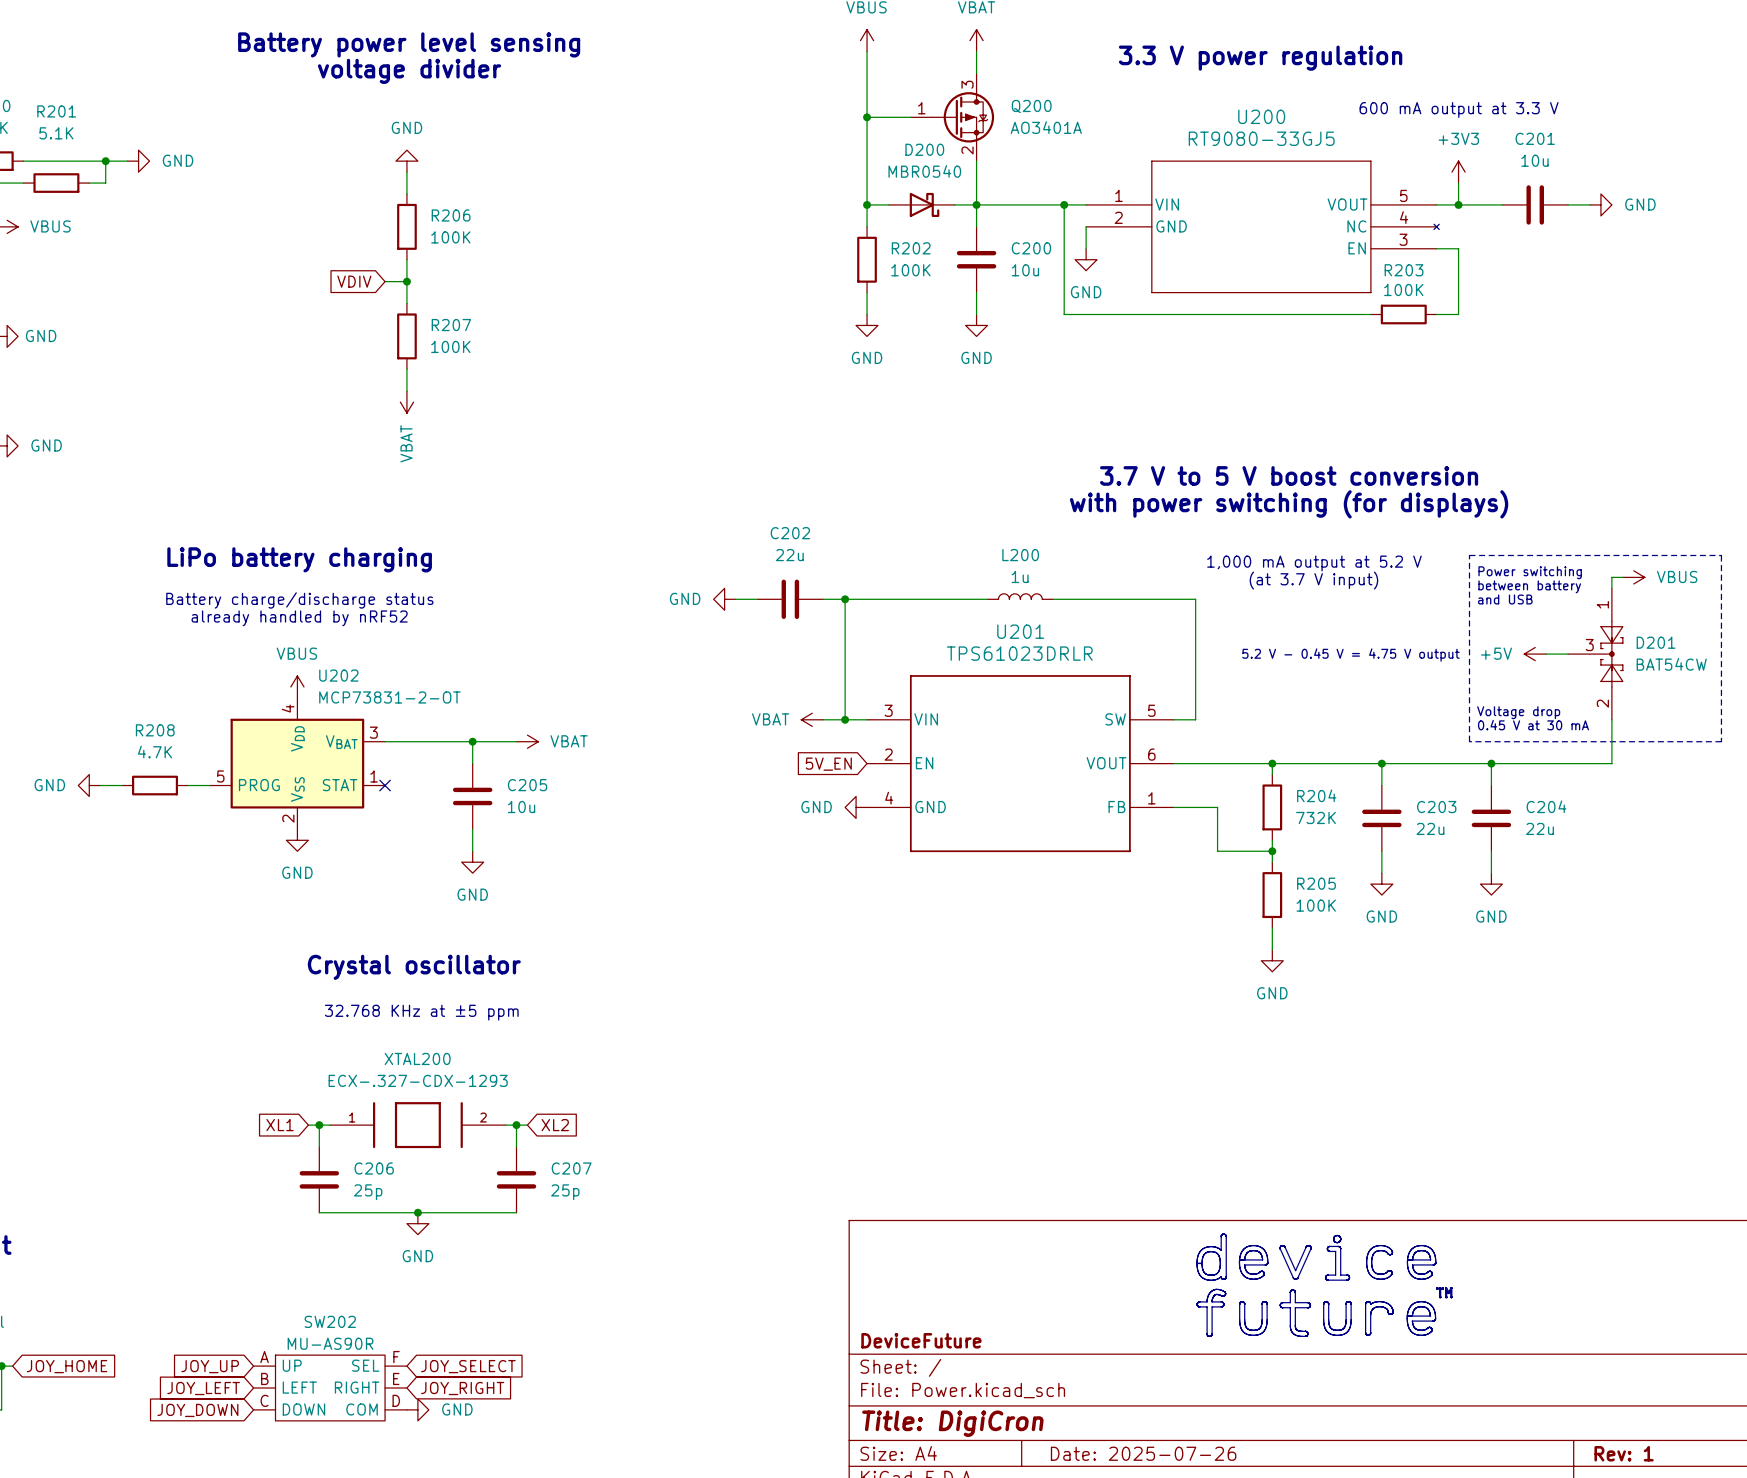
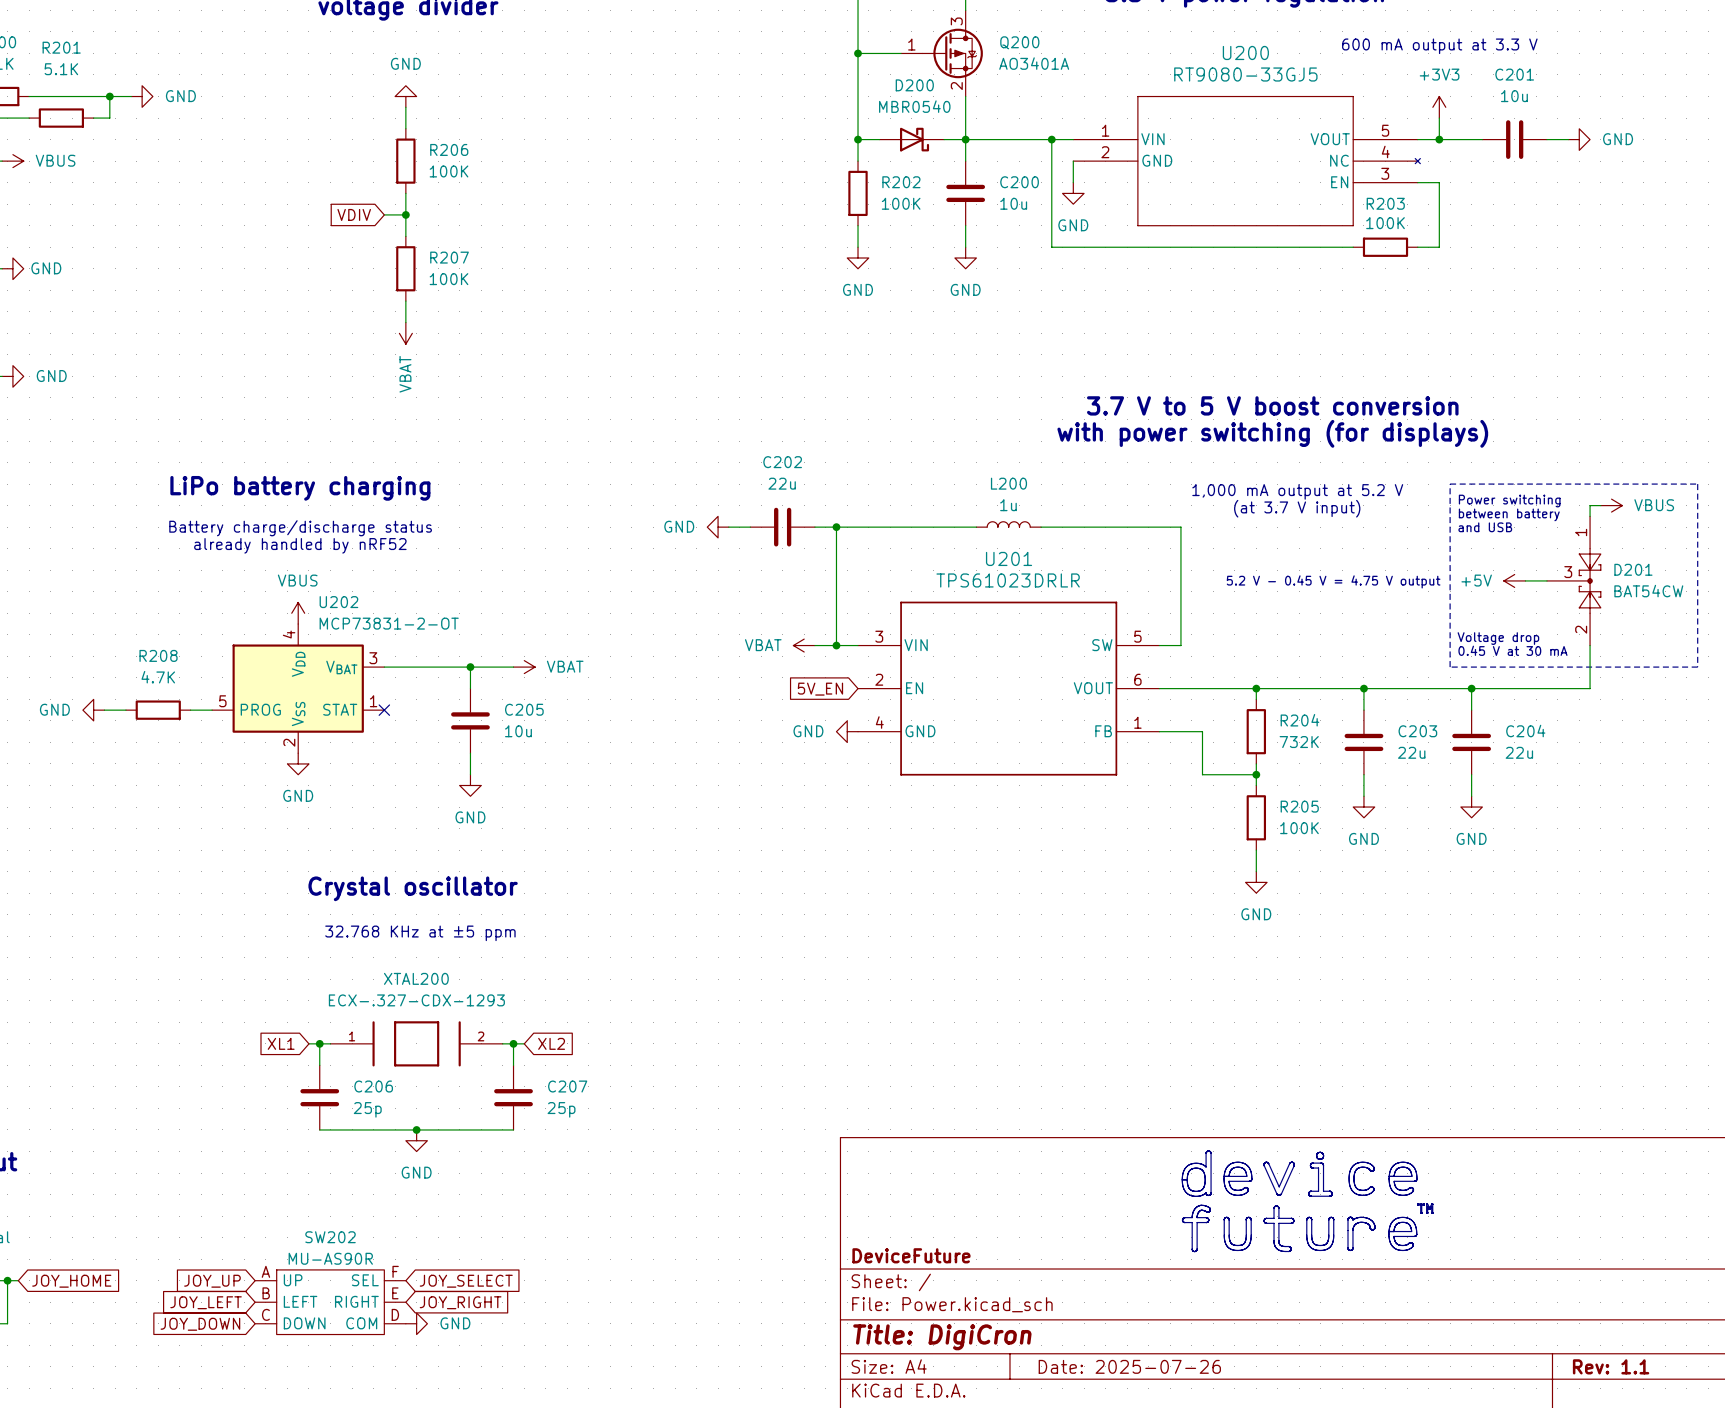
title block: Rev: 1 (1624, 1453) -> Rev: 1.1 (1611, 1366)

